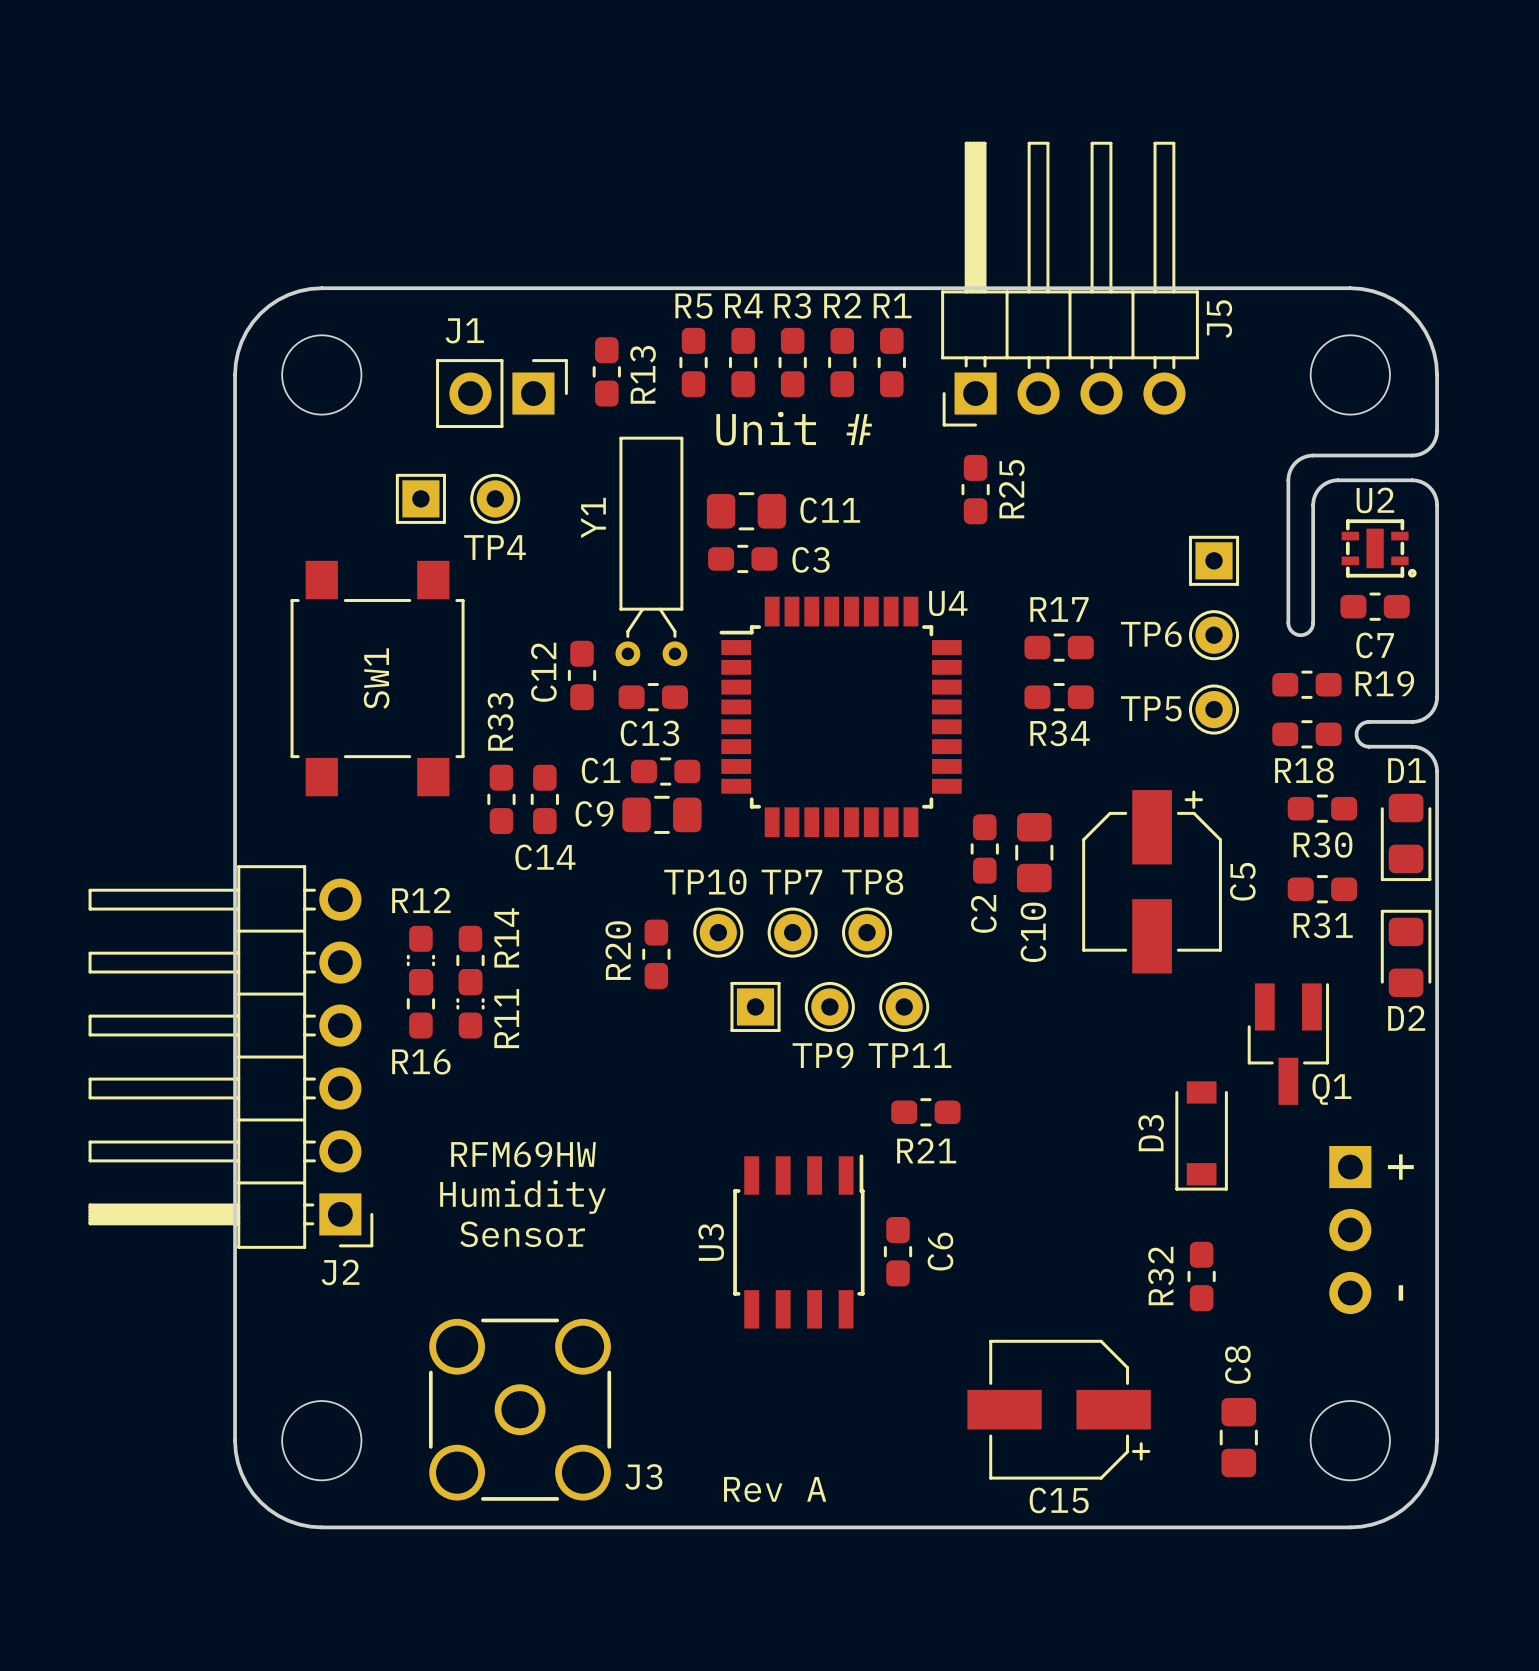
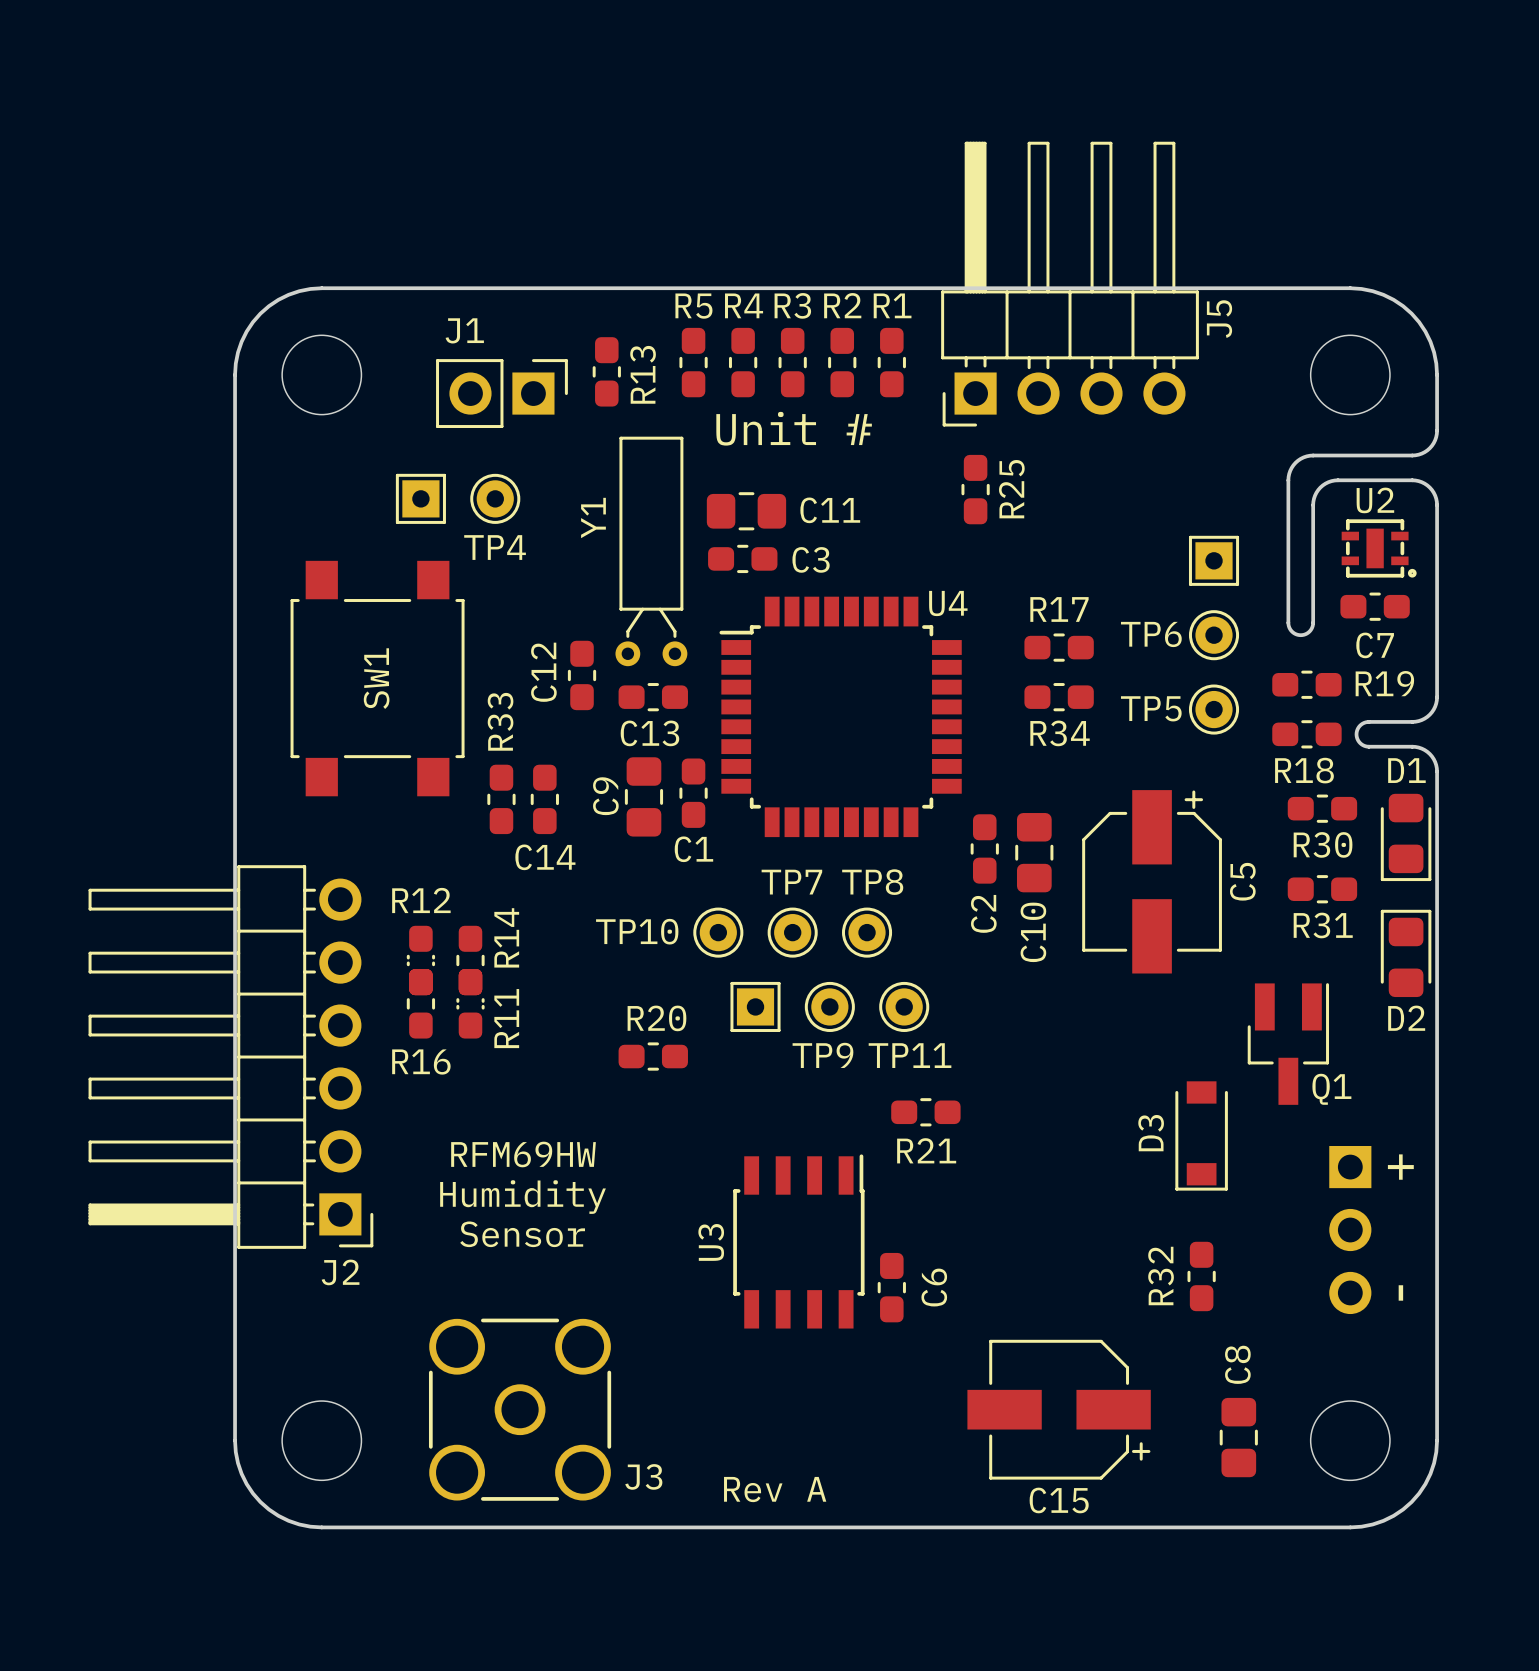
C1 name position: C1 (601, 770) -> C1 (693, 849)
C1 rotation: 0° (665, 771) -> 90° clockwise (693, 793)
C9 rotation: 0° (661, 814) -> 90° clockwise (643, 796)
TP10 name position: TP10 (705, 882) -> TP10 (637, 931)
R20 rotation: 0° (656, 954) -> 90° clockwise (653, 1056)
R20 position: (656, 954) -> (653, 1056)
C6 position: (898, 1251) -> (891, 1287)

